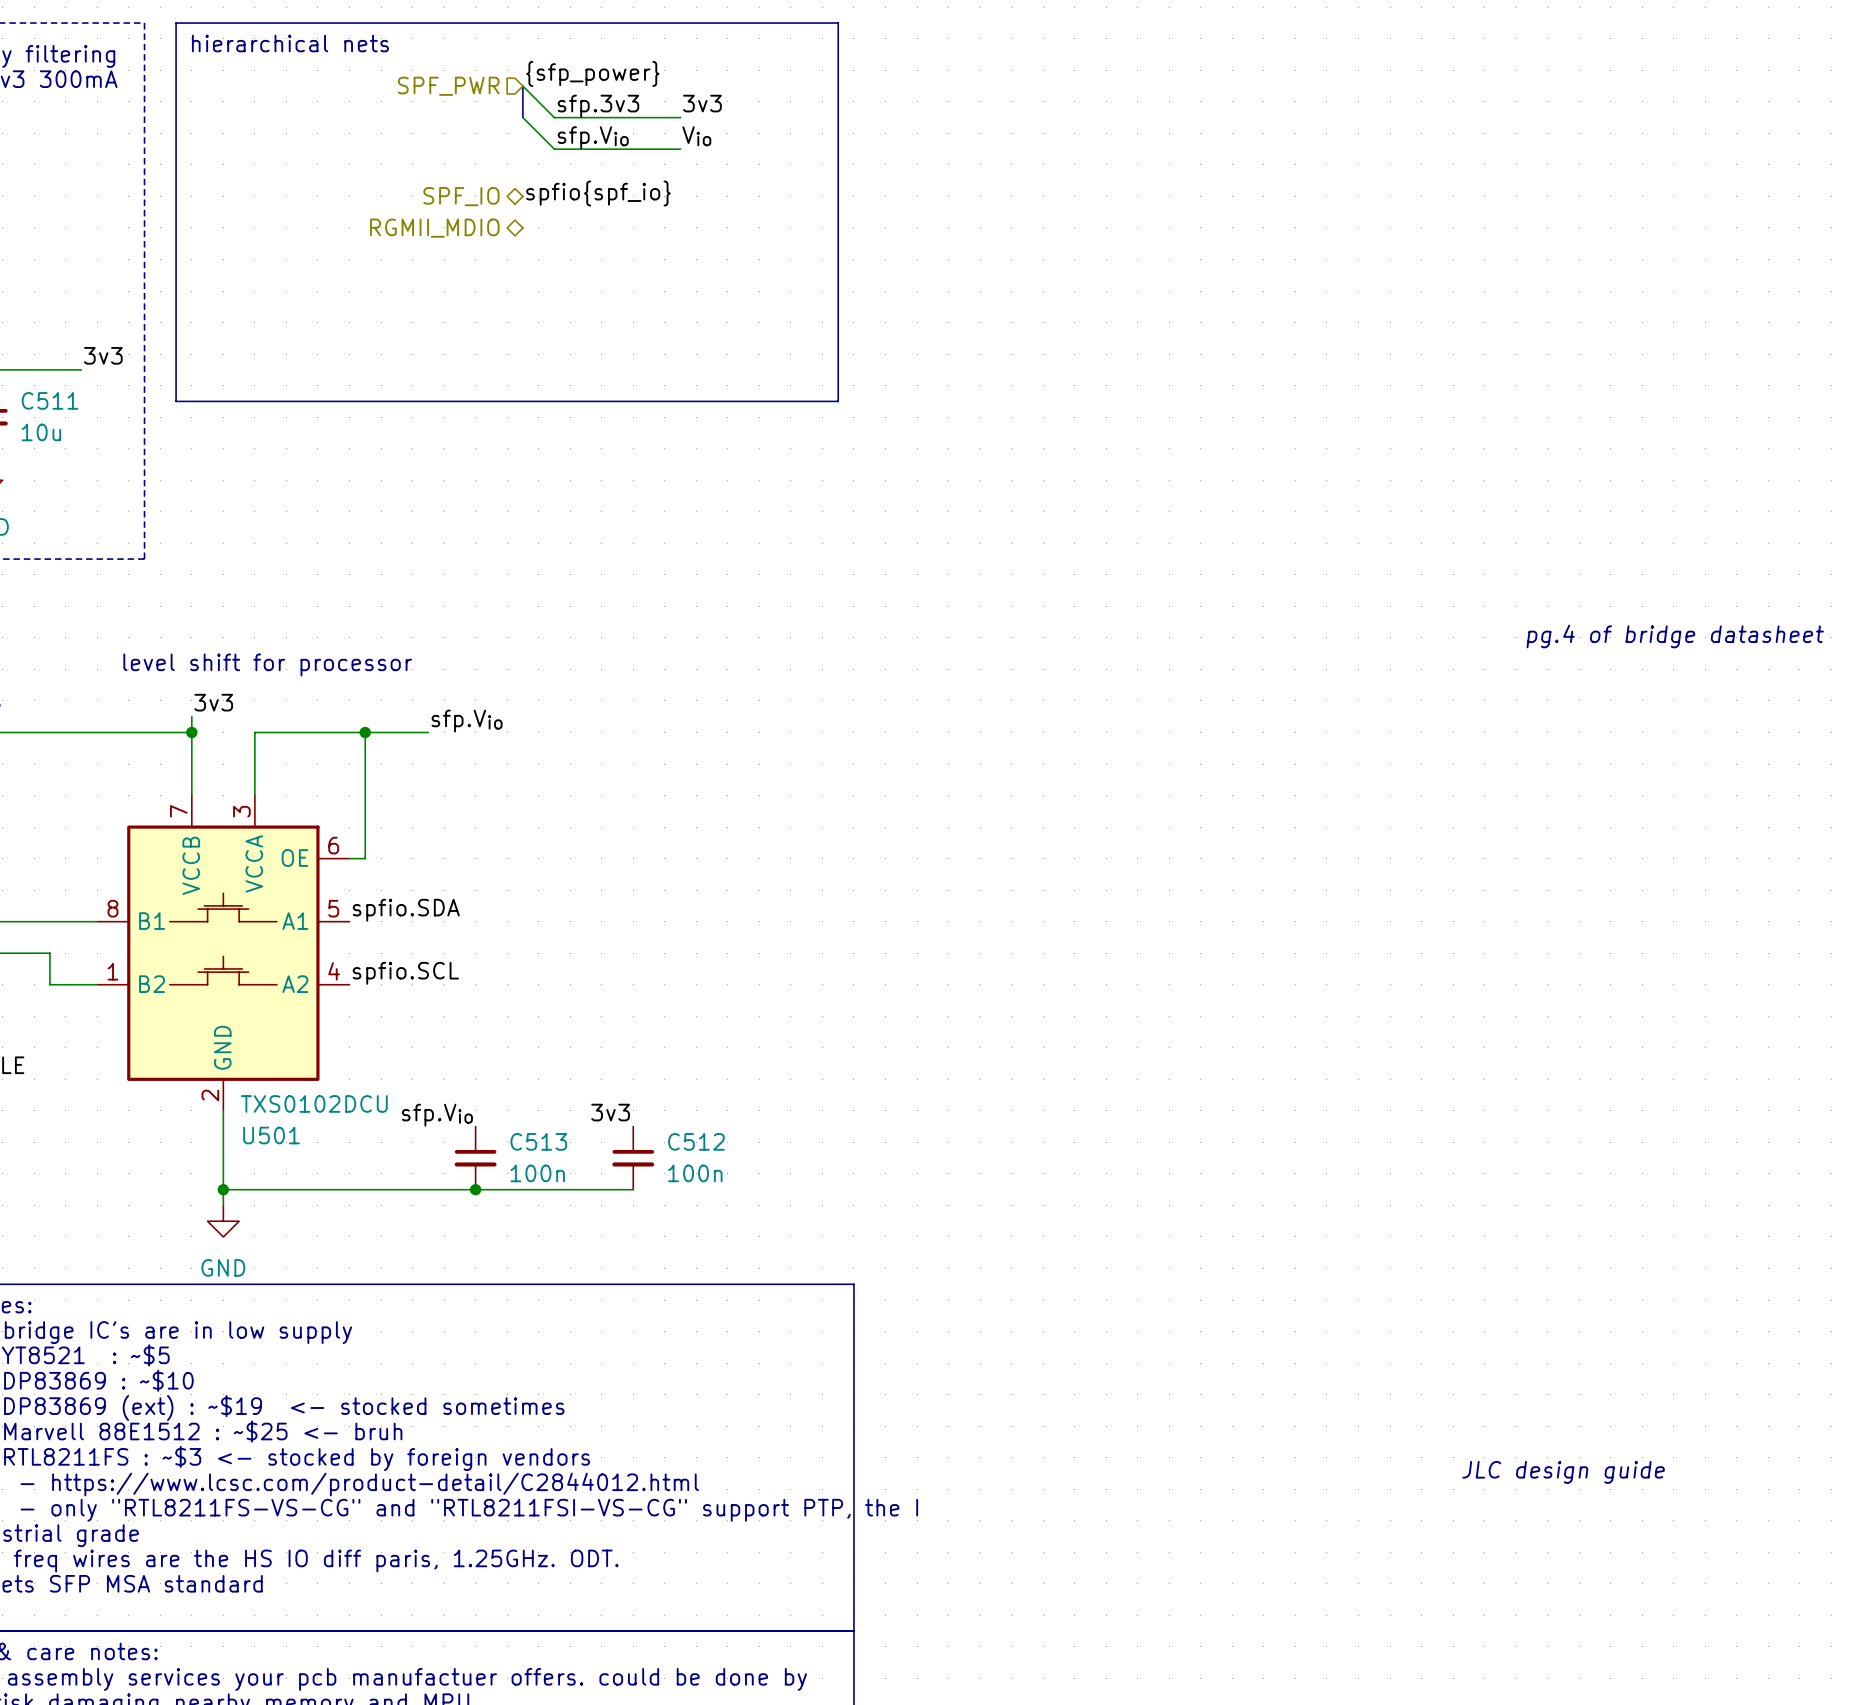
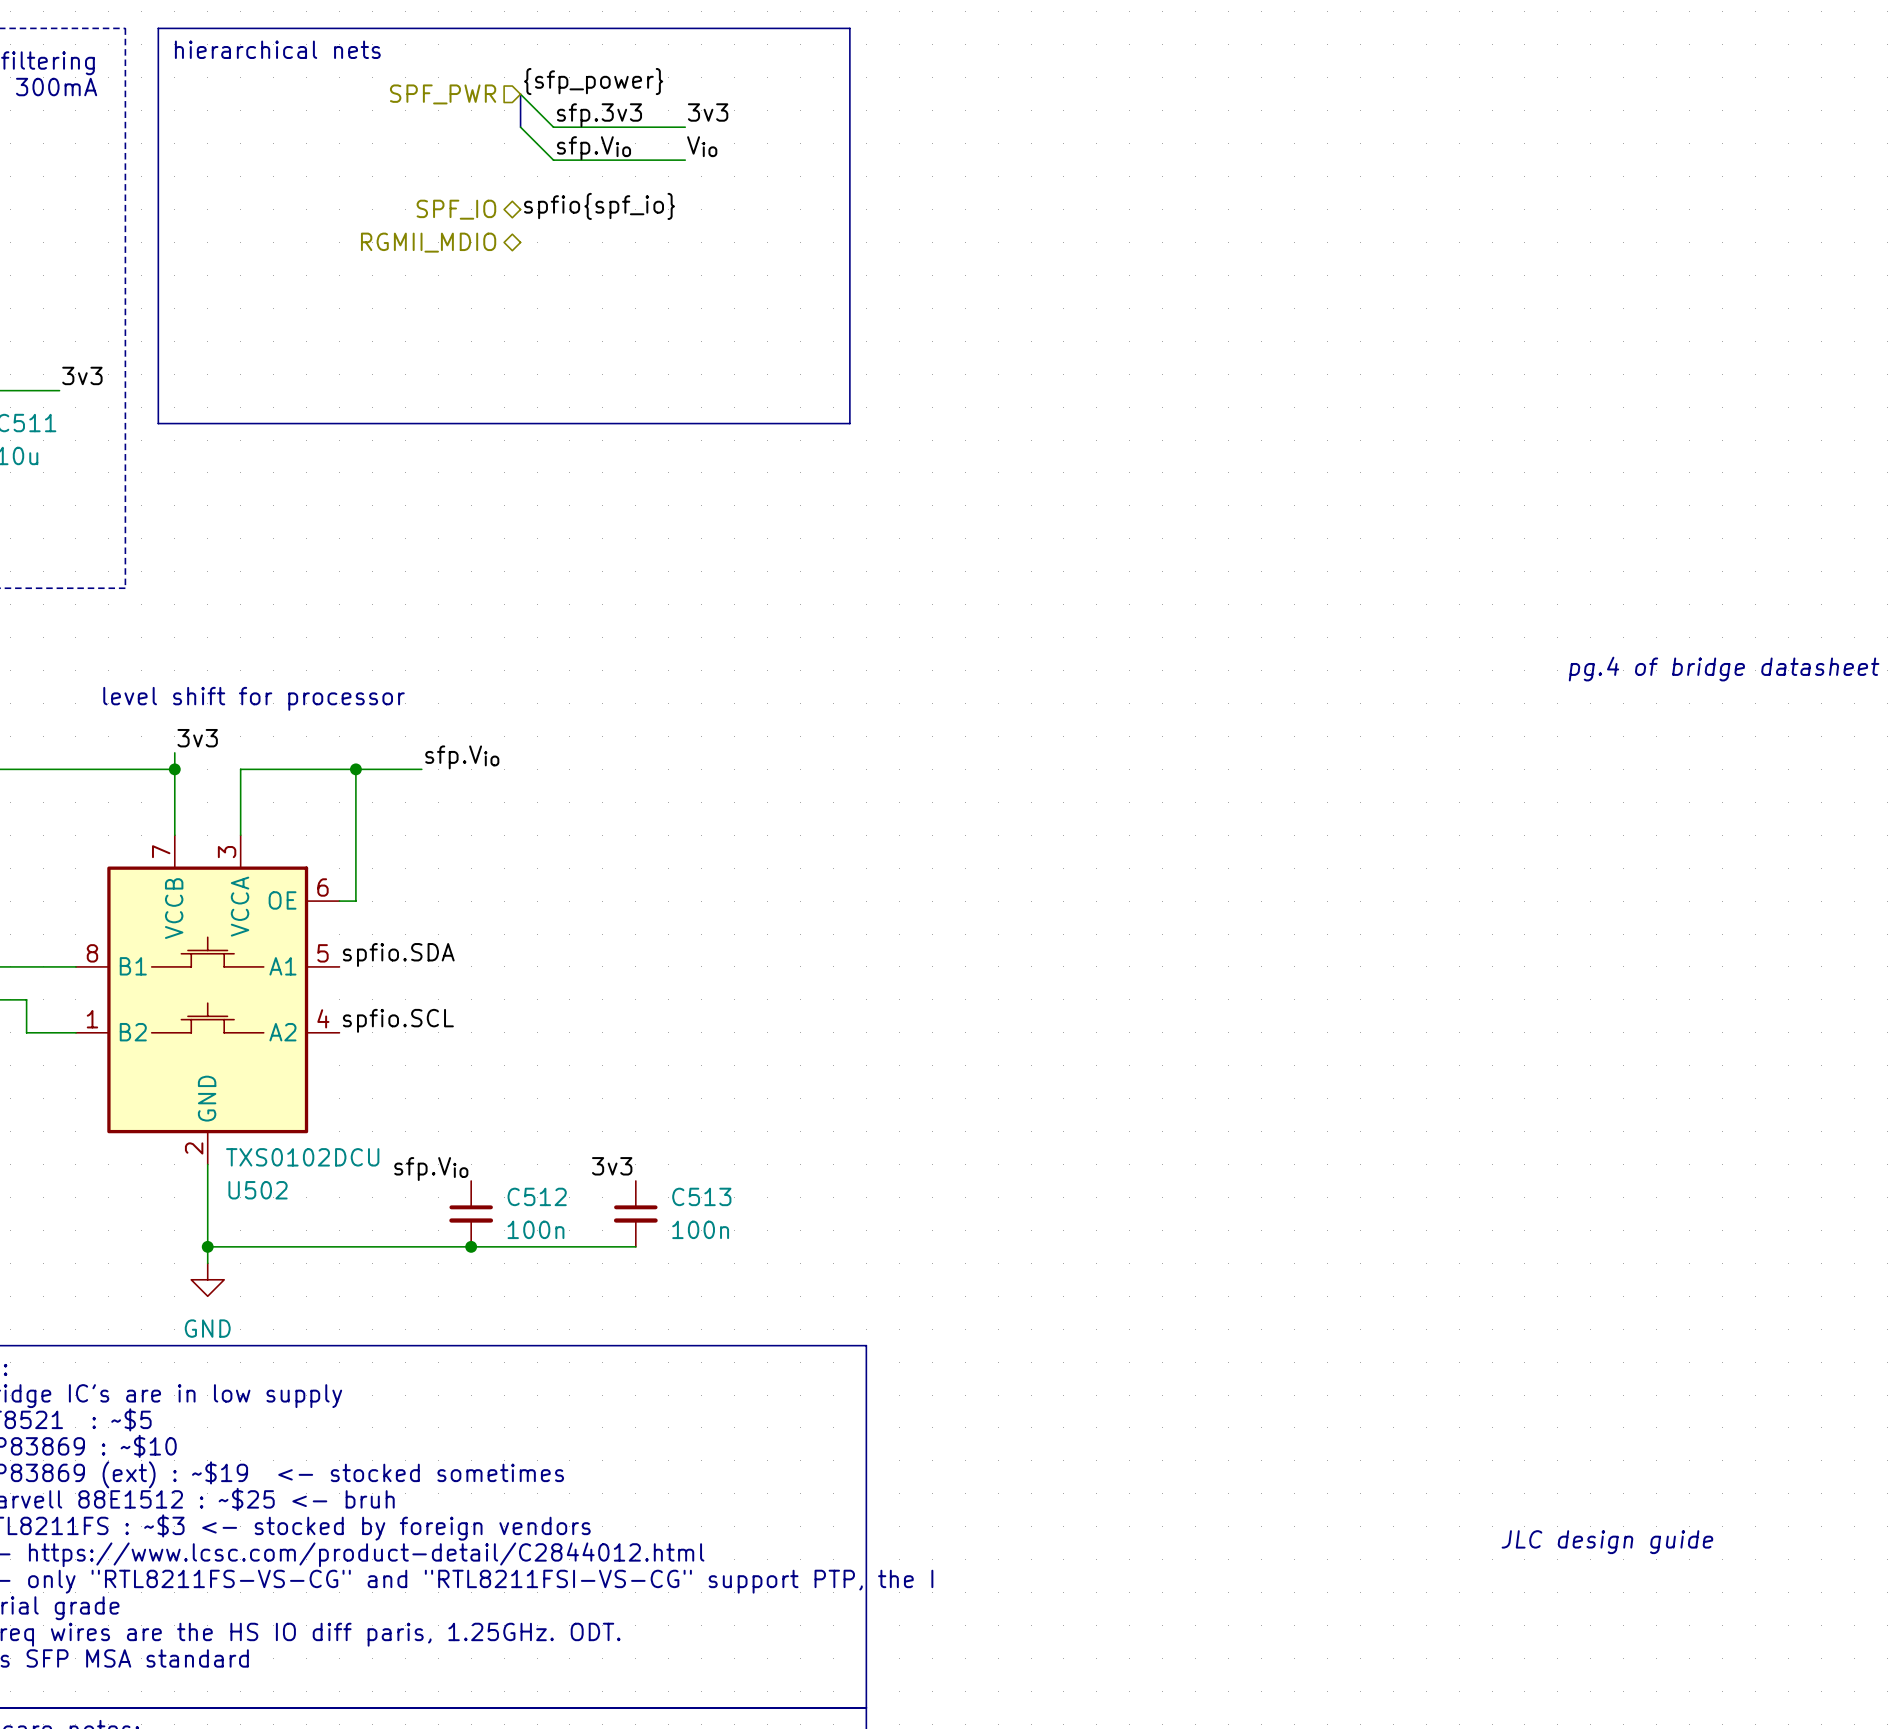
U501 name: U501 (271, 1135) -> U502 (258, 1190)
C513 name: C513 (538, 1141) -> C512 (537, 1196)
C512 name: C512 (696, 1141) -> C513 (701, 1196)

